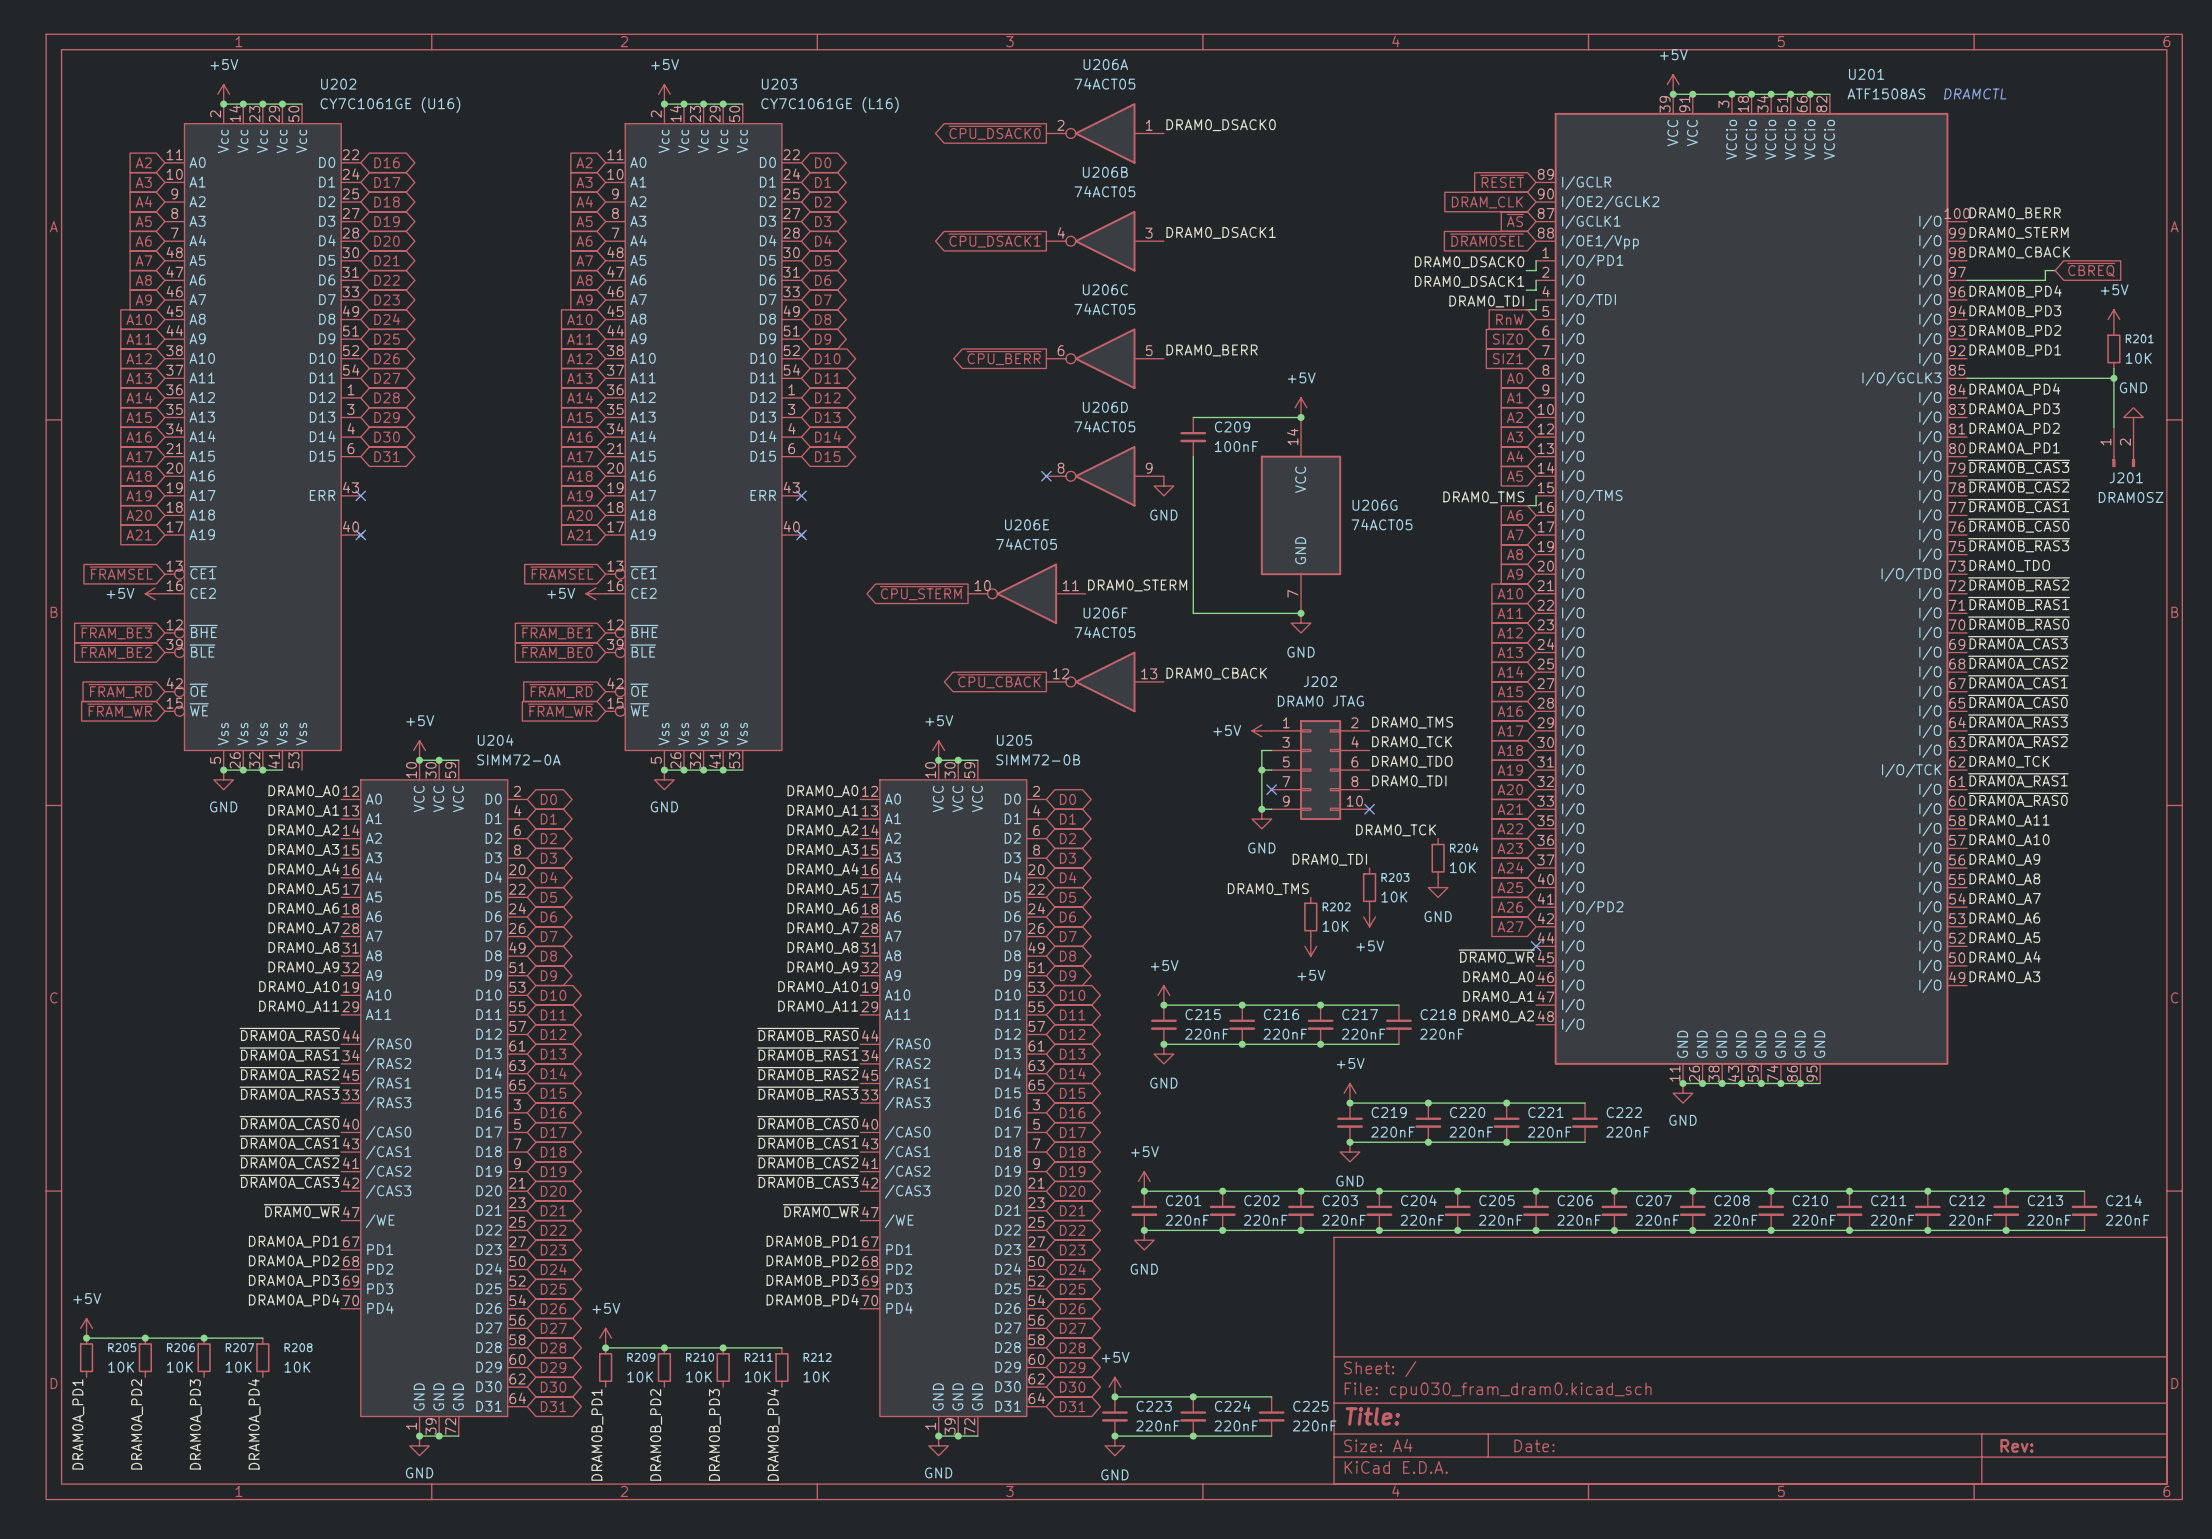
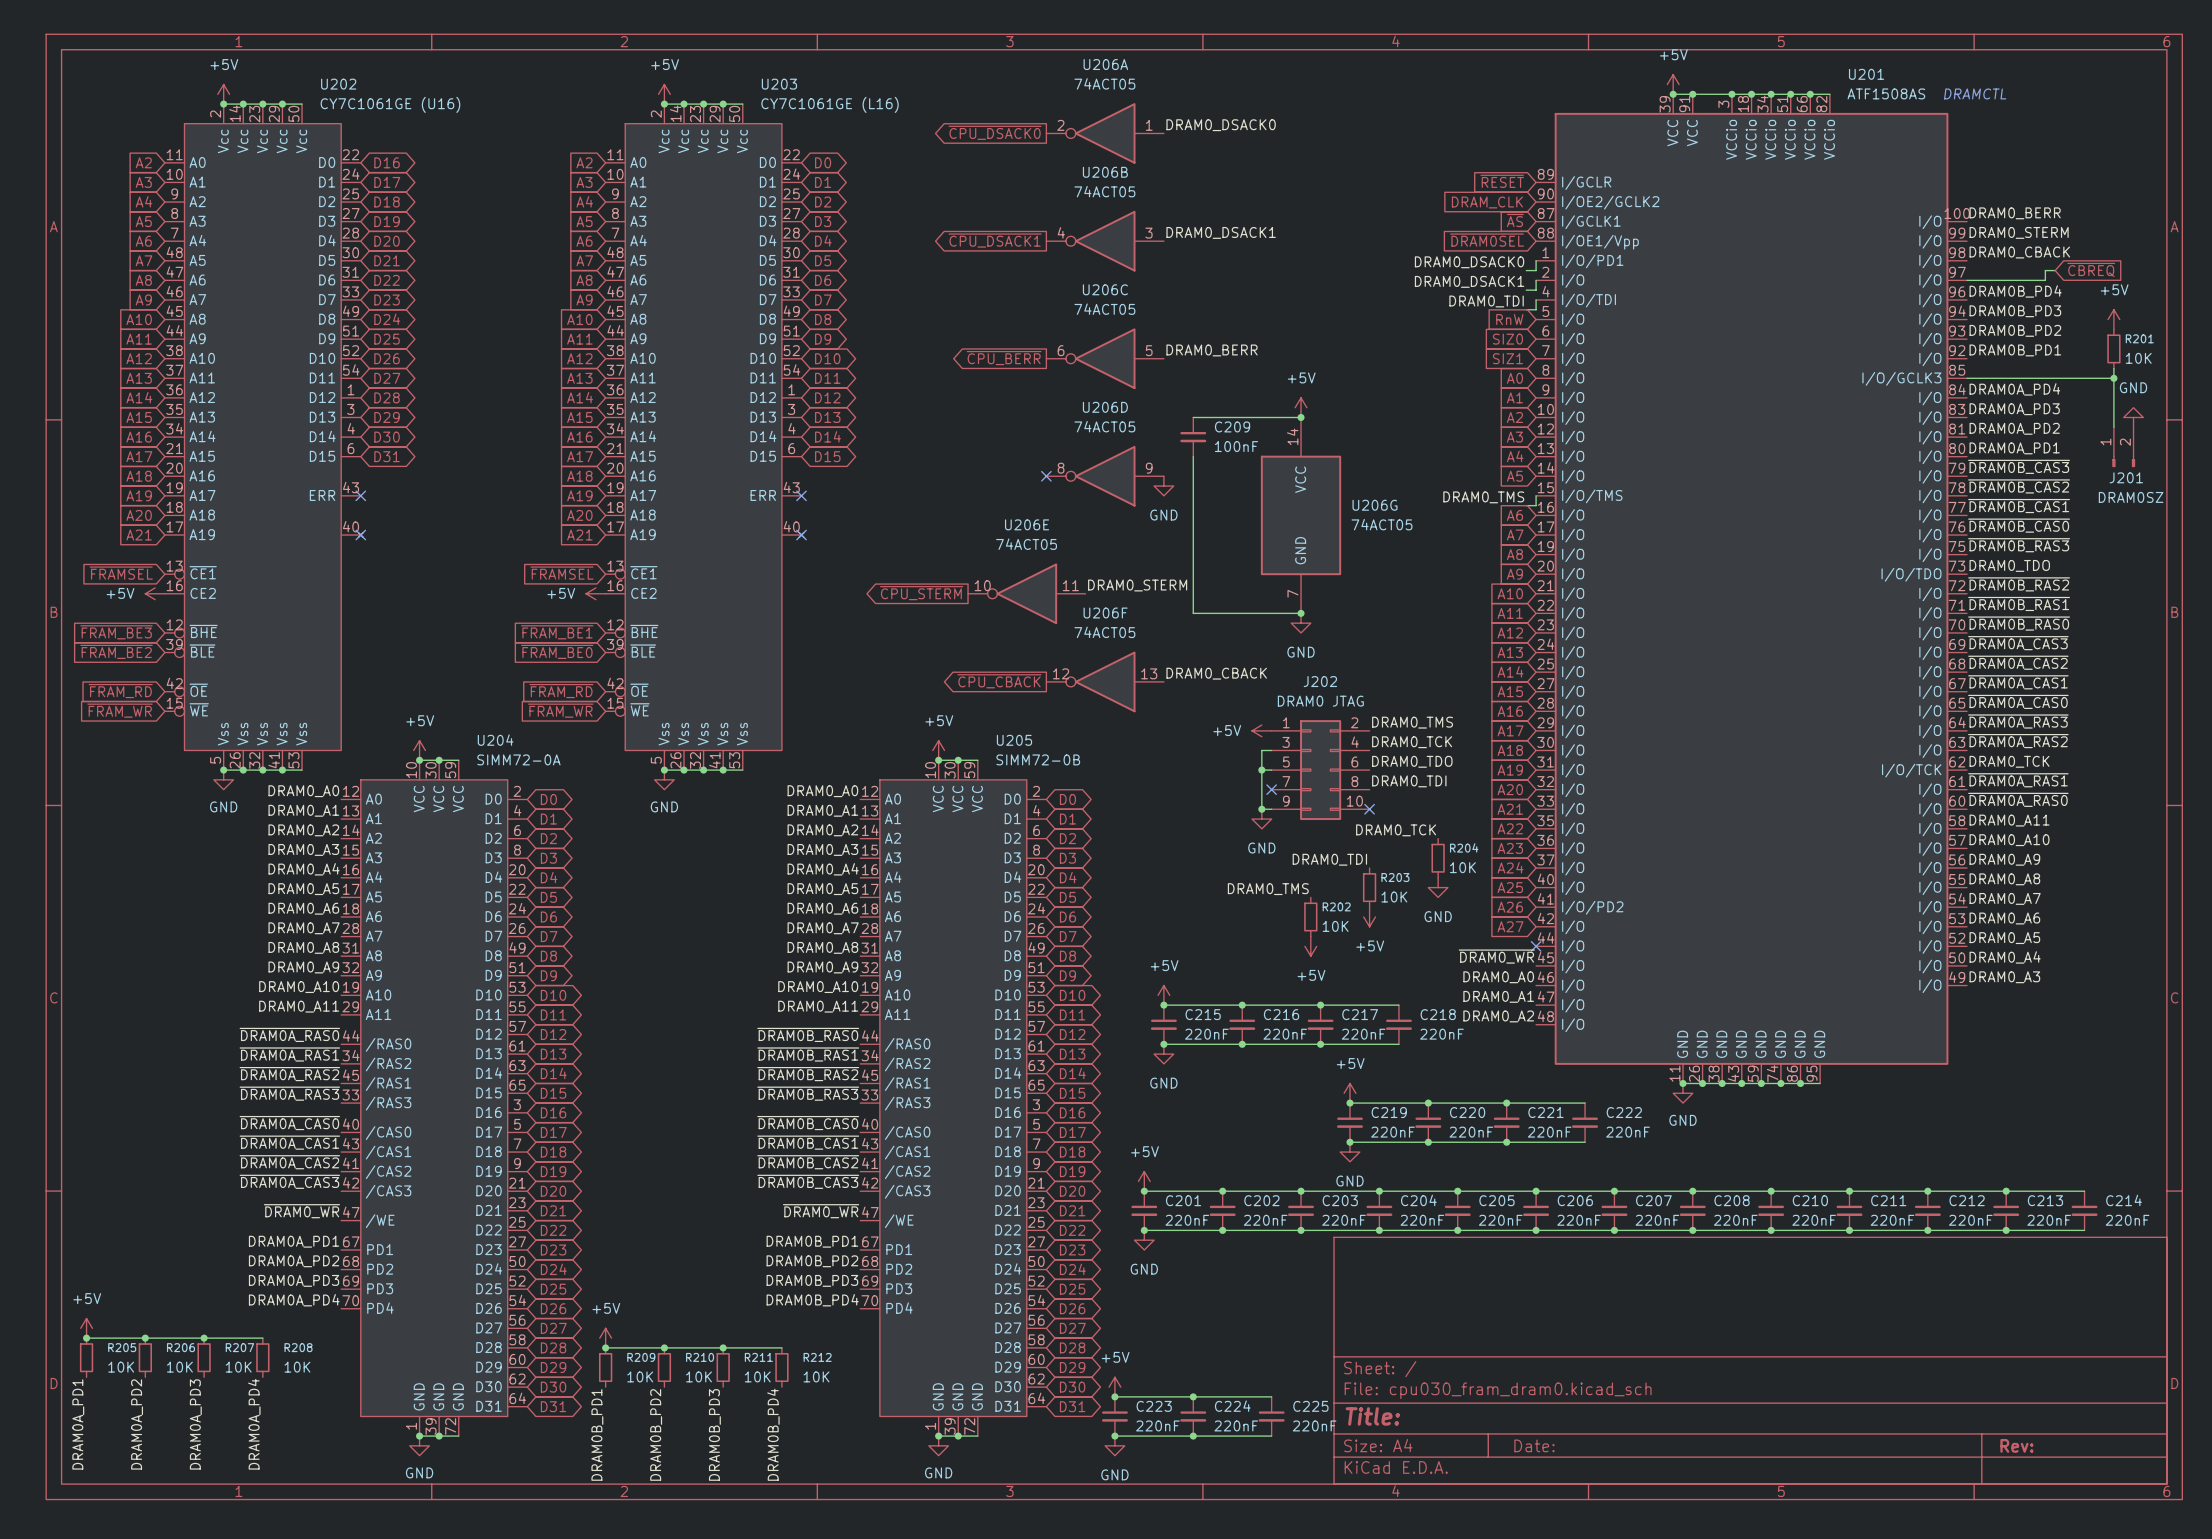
wire: none -> (282, 770) (302, 770)
junction: none -> (282, 770)

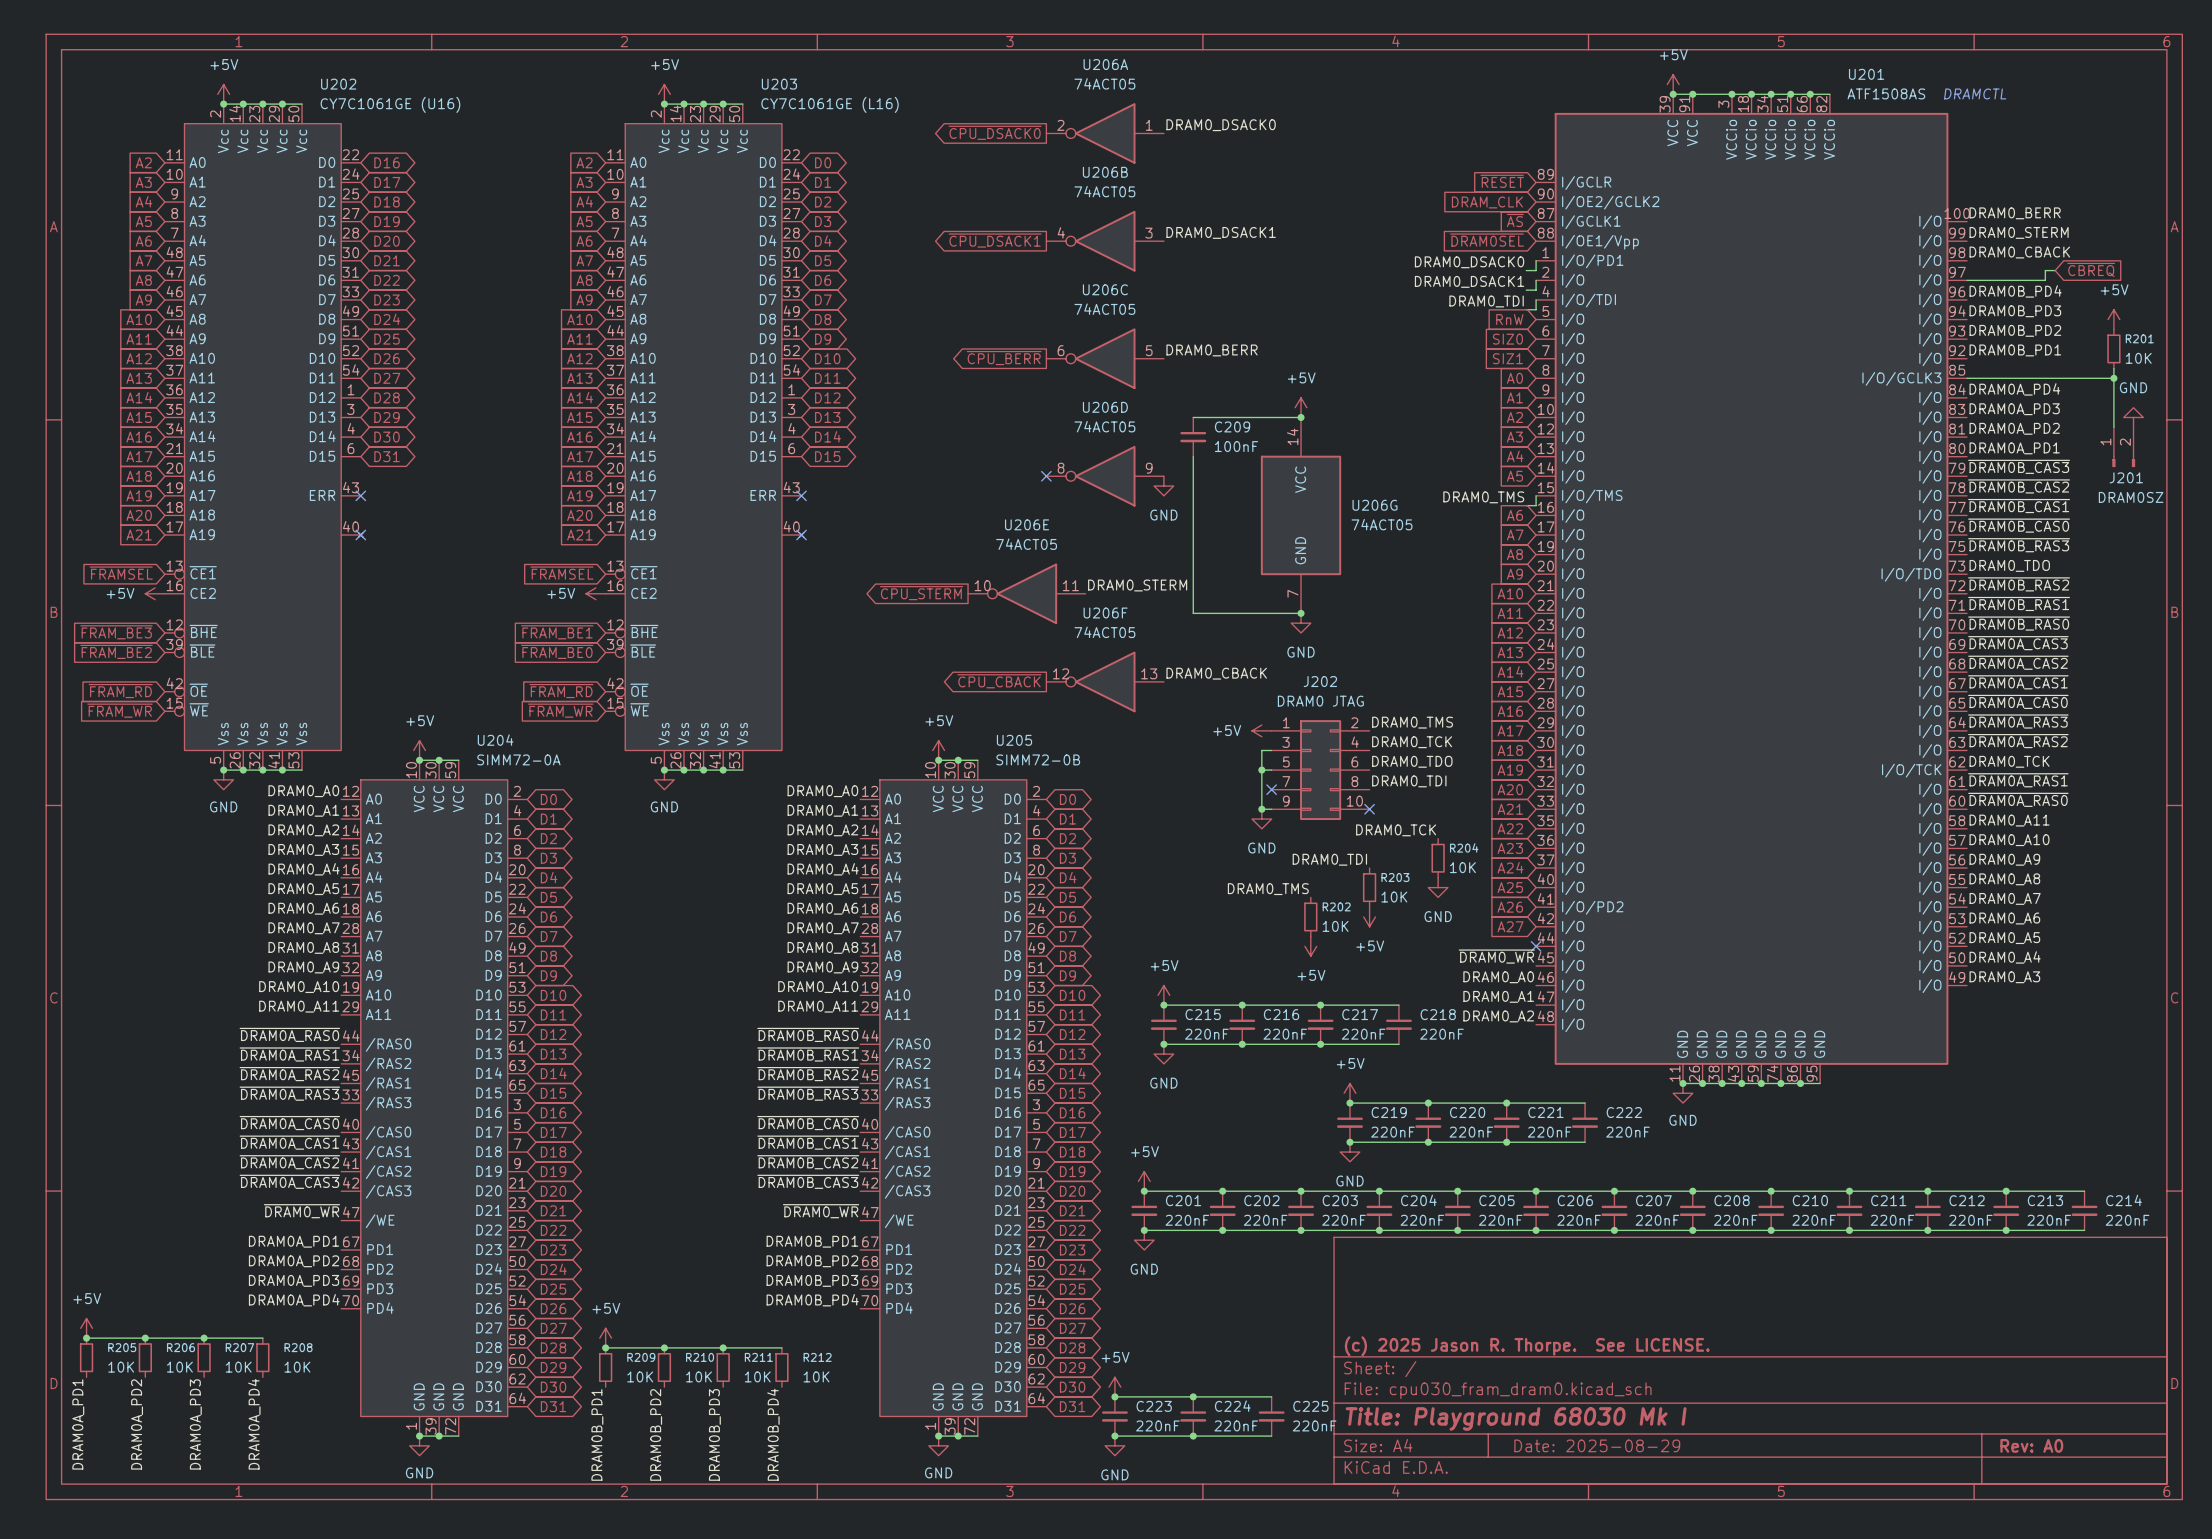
title block: none -> (c) 2025 Jason R. Thorpe. See LICENSE. (1527, 1346)
title block: Title: (1372, 1416) -> Title: Playground 68030 Mk I (1516, 1419)
title block: Date: (1534, 1445) -> Date: 2025-08-29 (1597, 1445)
title block: Rev: (2016, 1445) -> Rev: A0 (2031, 1445)

